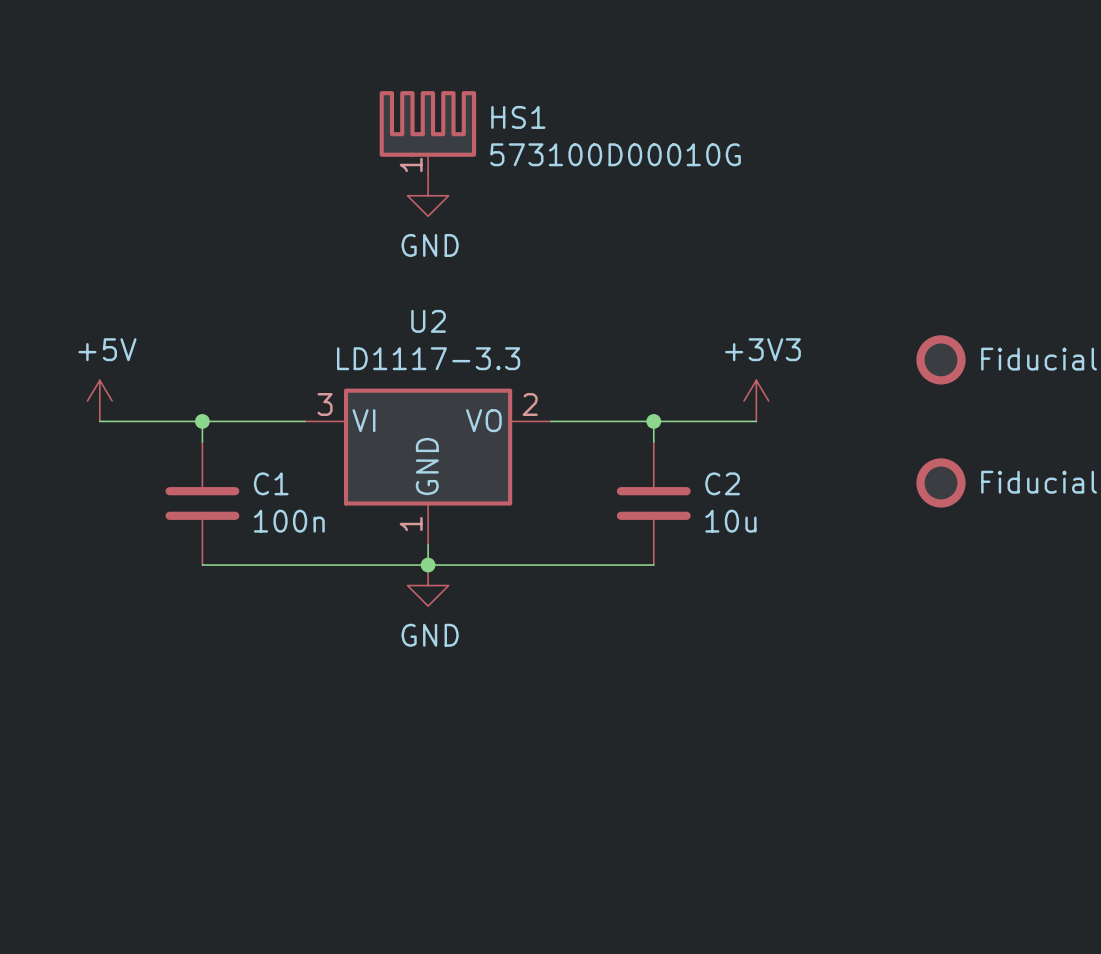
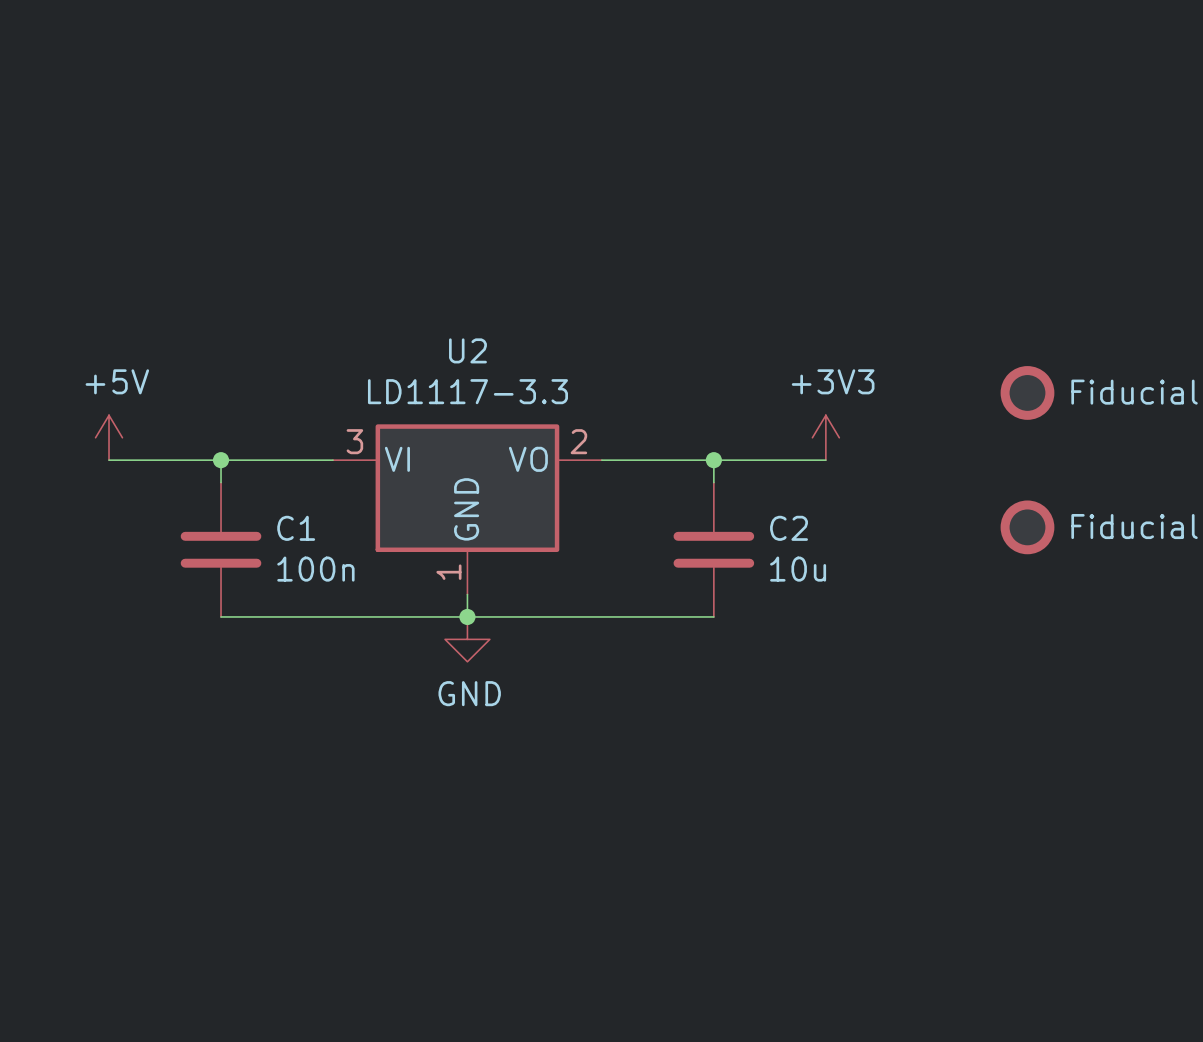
HS1: 573100D00010G (427, 133) -> none
power symbol: GND (428, 195) -> none

